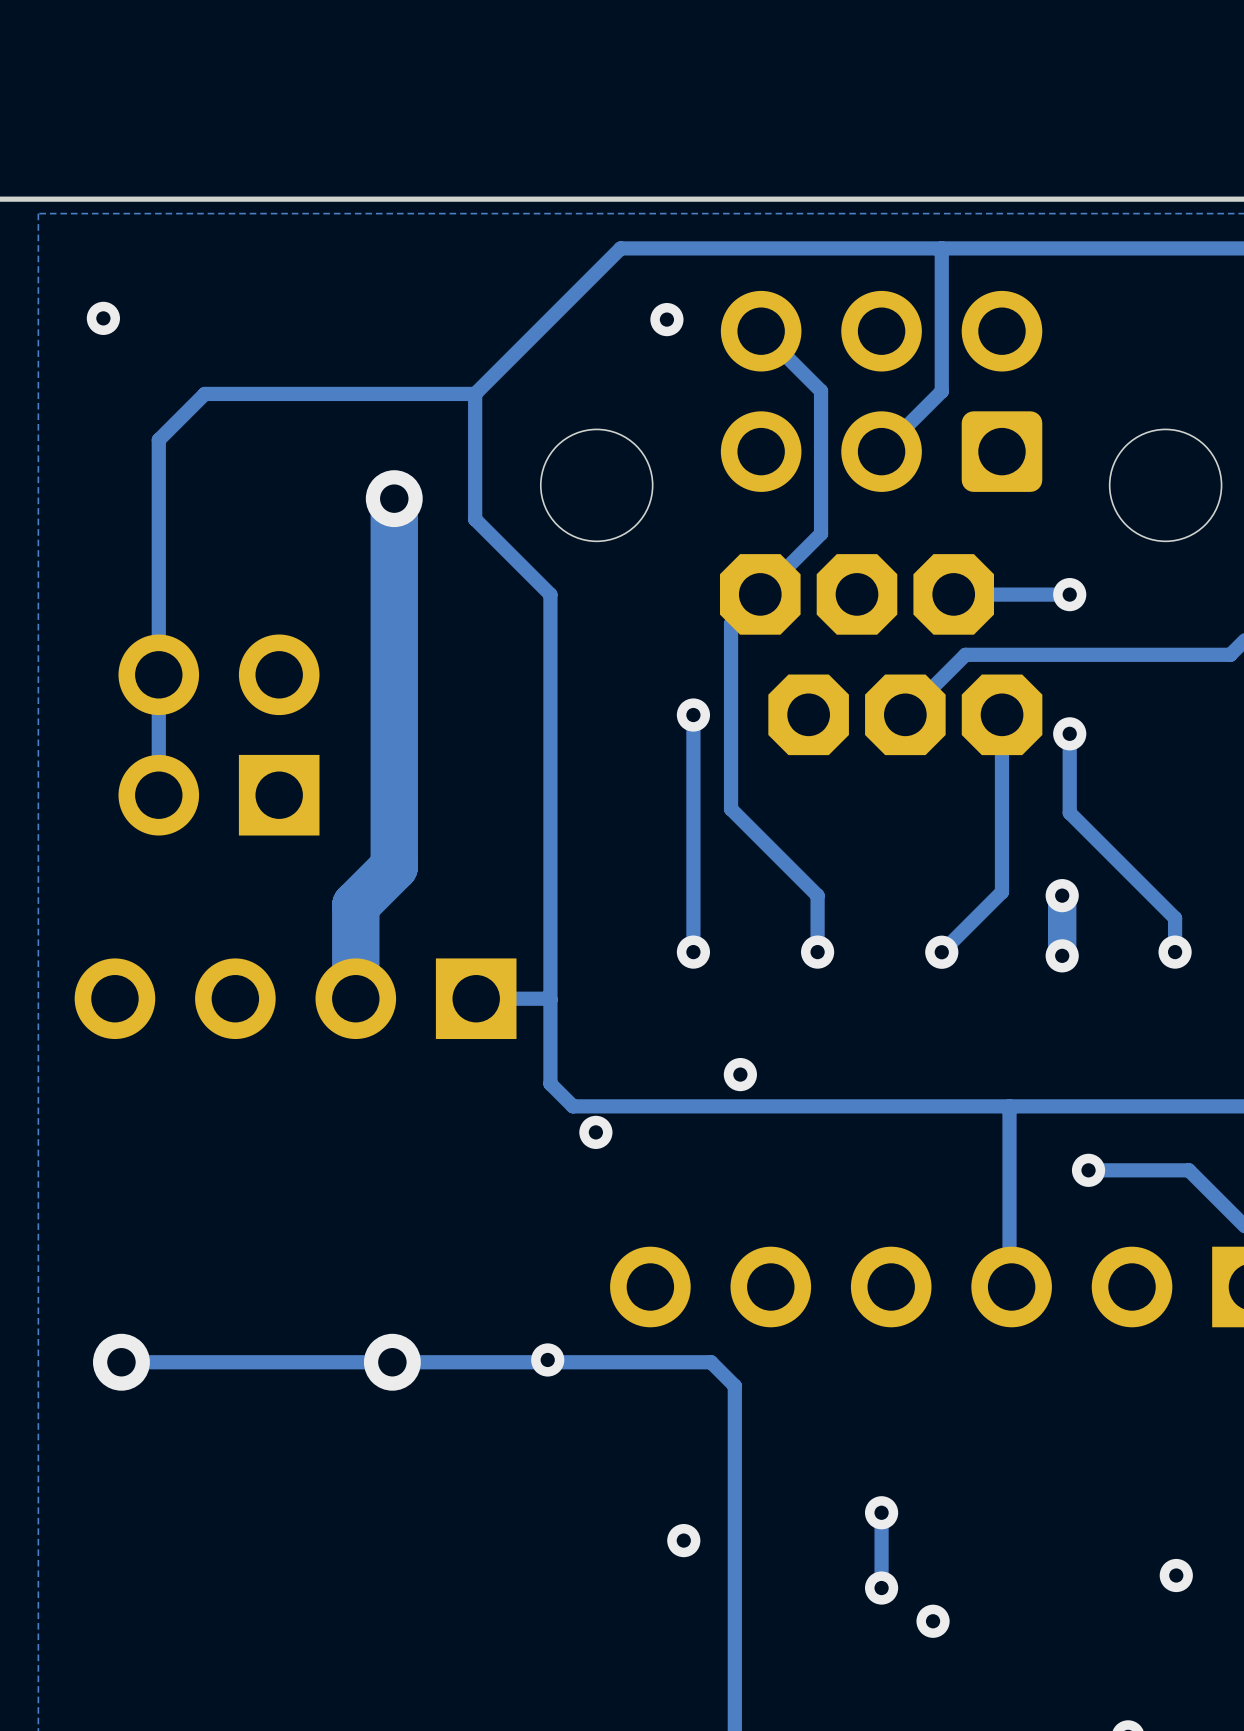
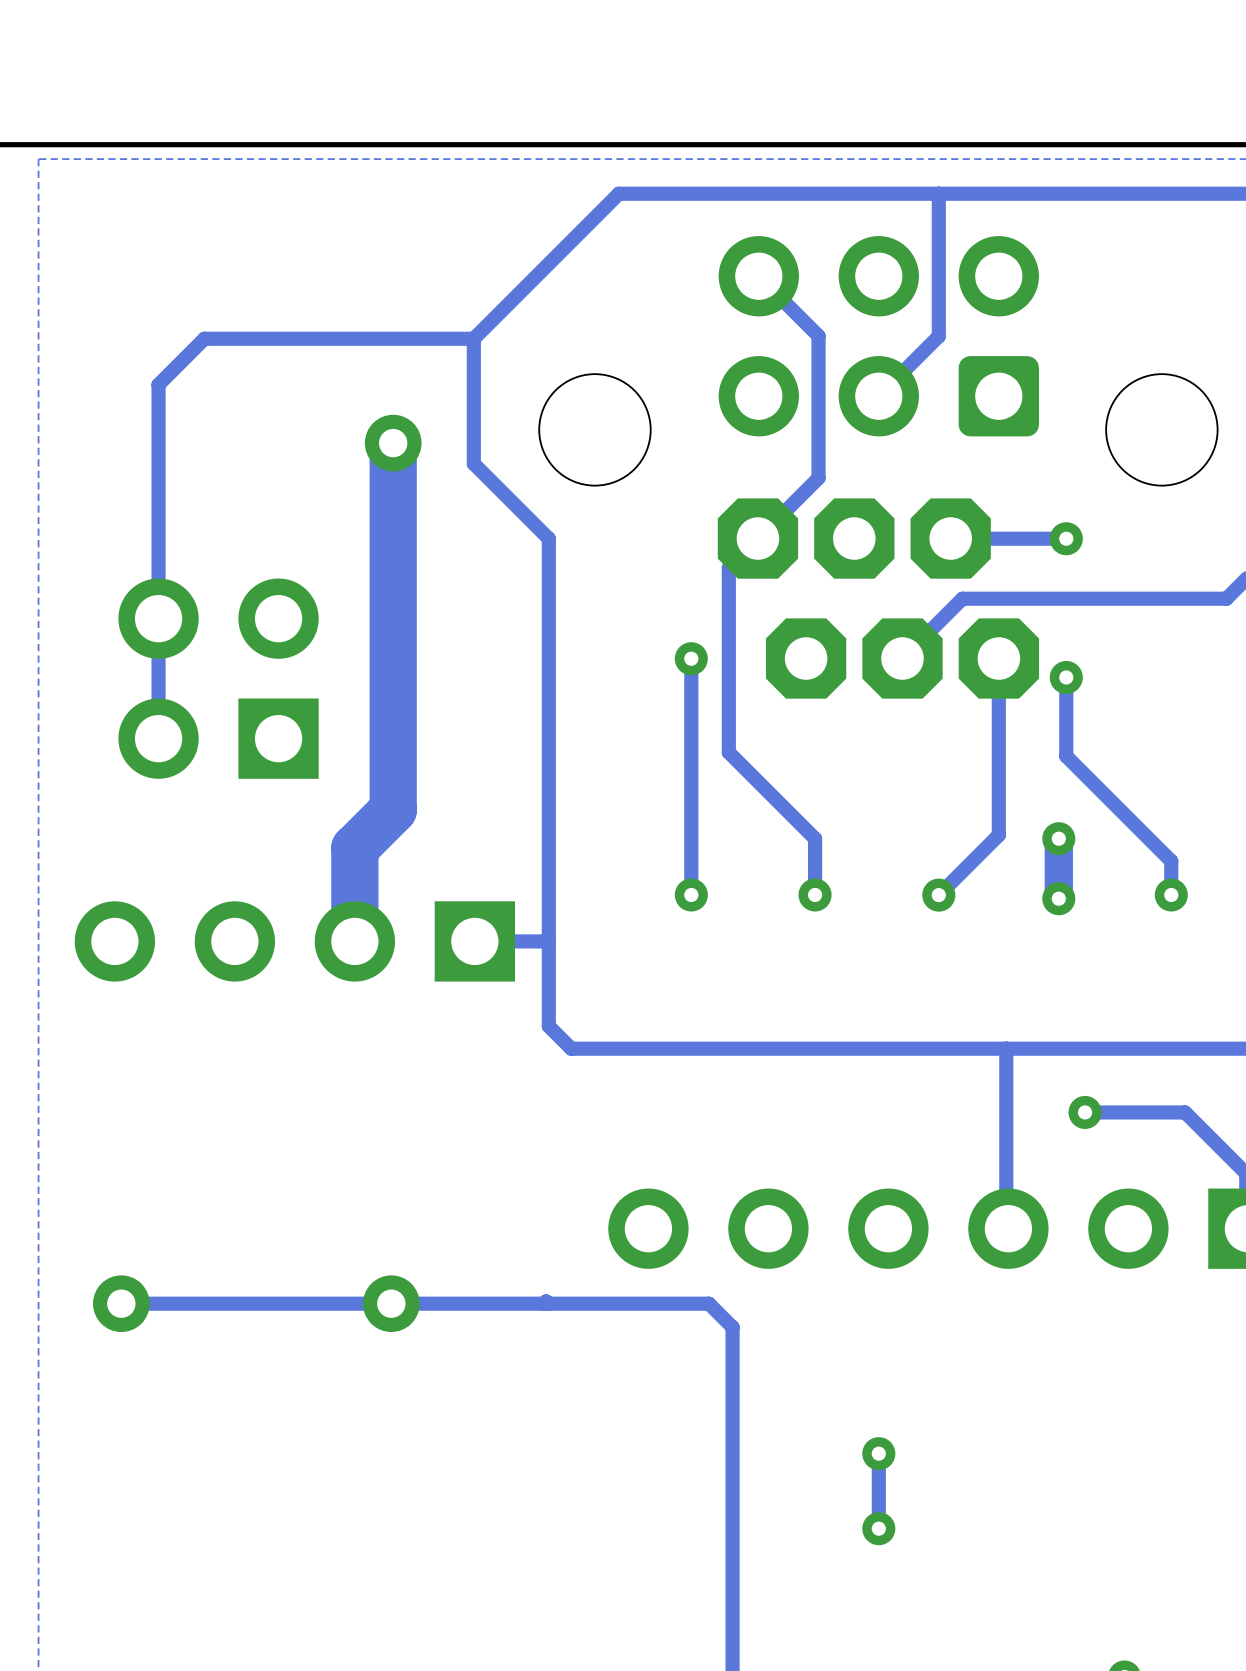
via: (103, 318) -> none
via: (666, 319) -> none
via: (740, 1074) -> none
via: (595, 1132) -> none
via: (547, 1359) -> none
via: (683, 1540) -> none
via: (1176, 1575) -> none
via: (933, 1621) -> none

